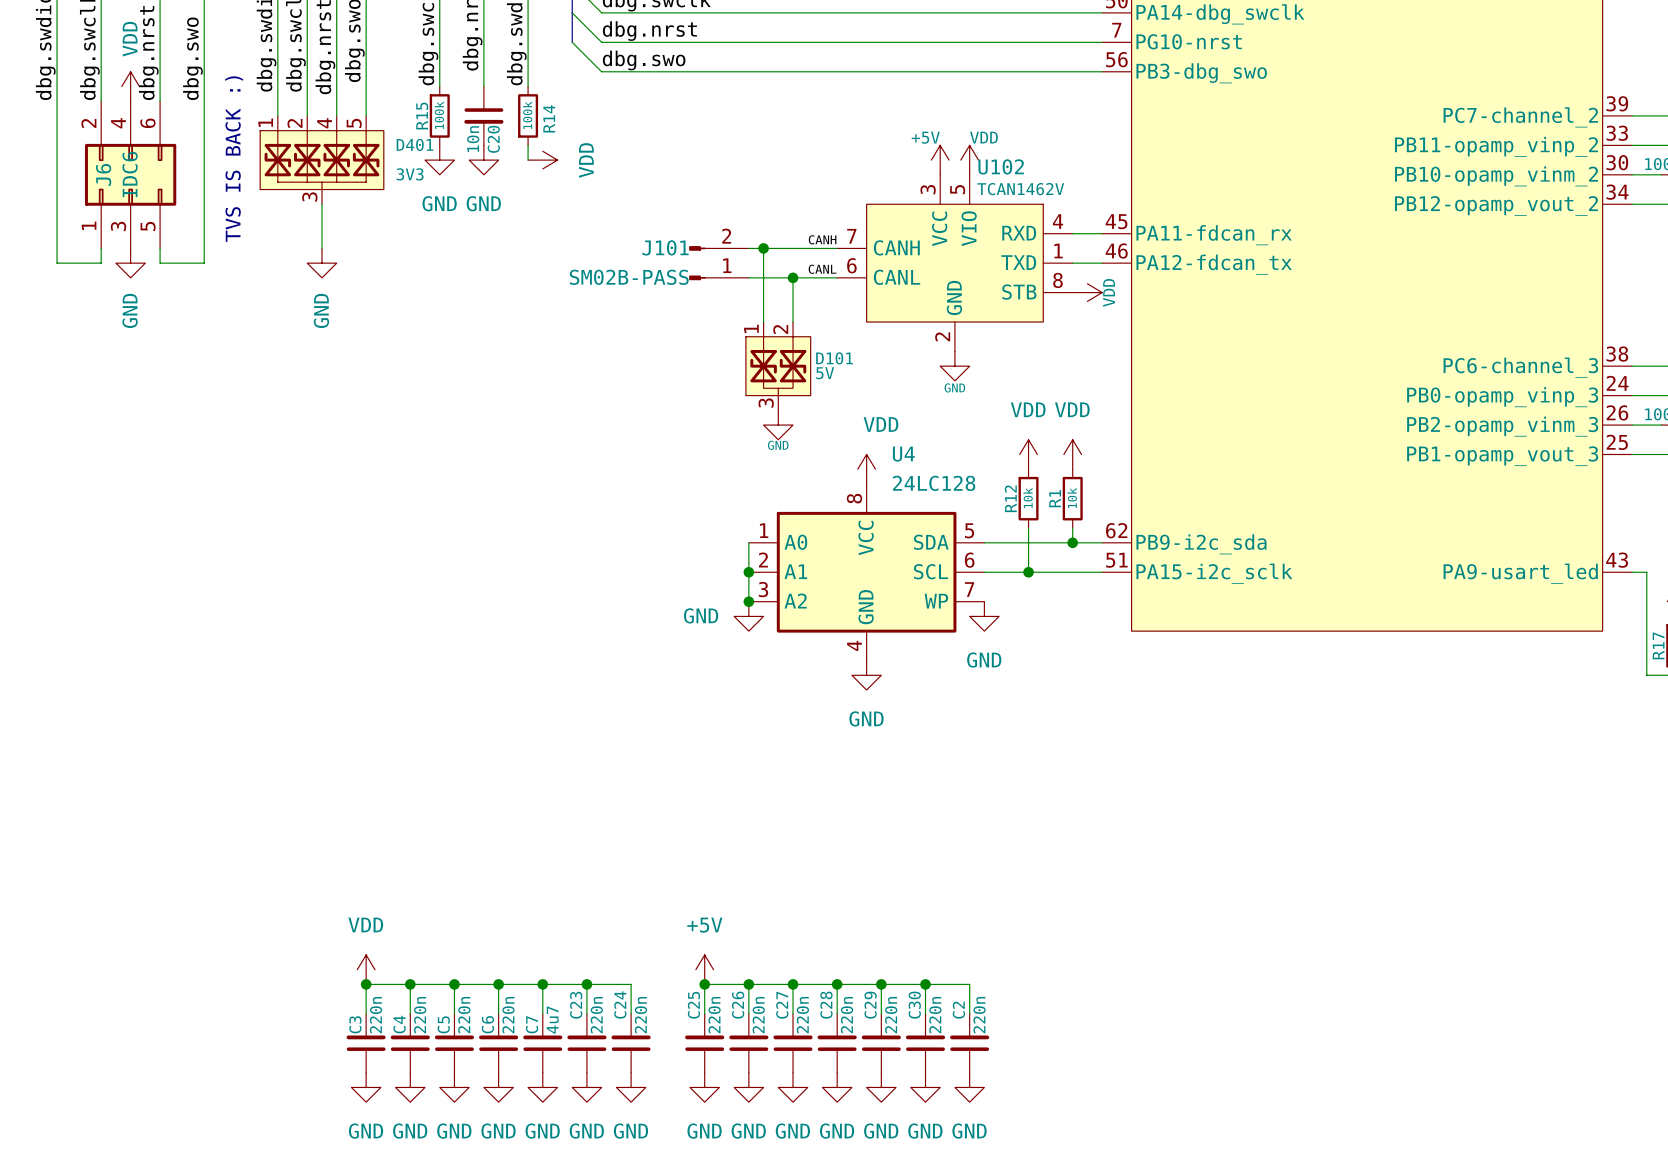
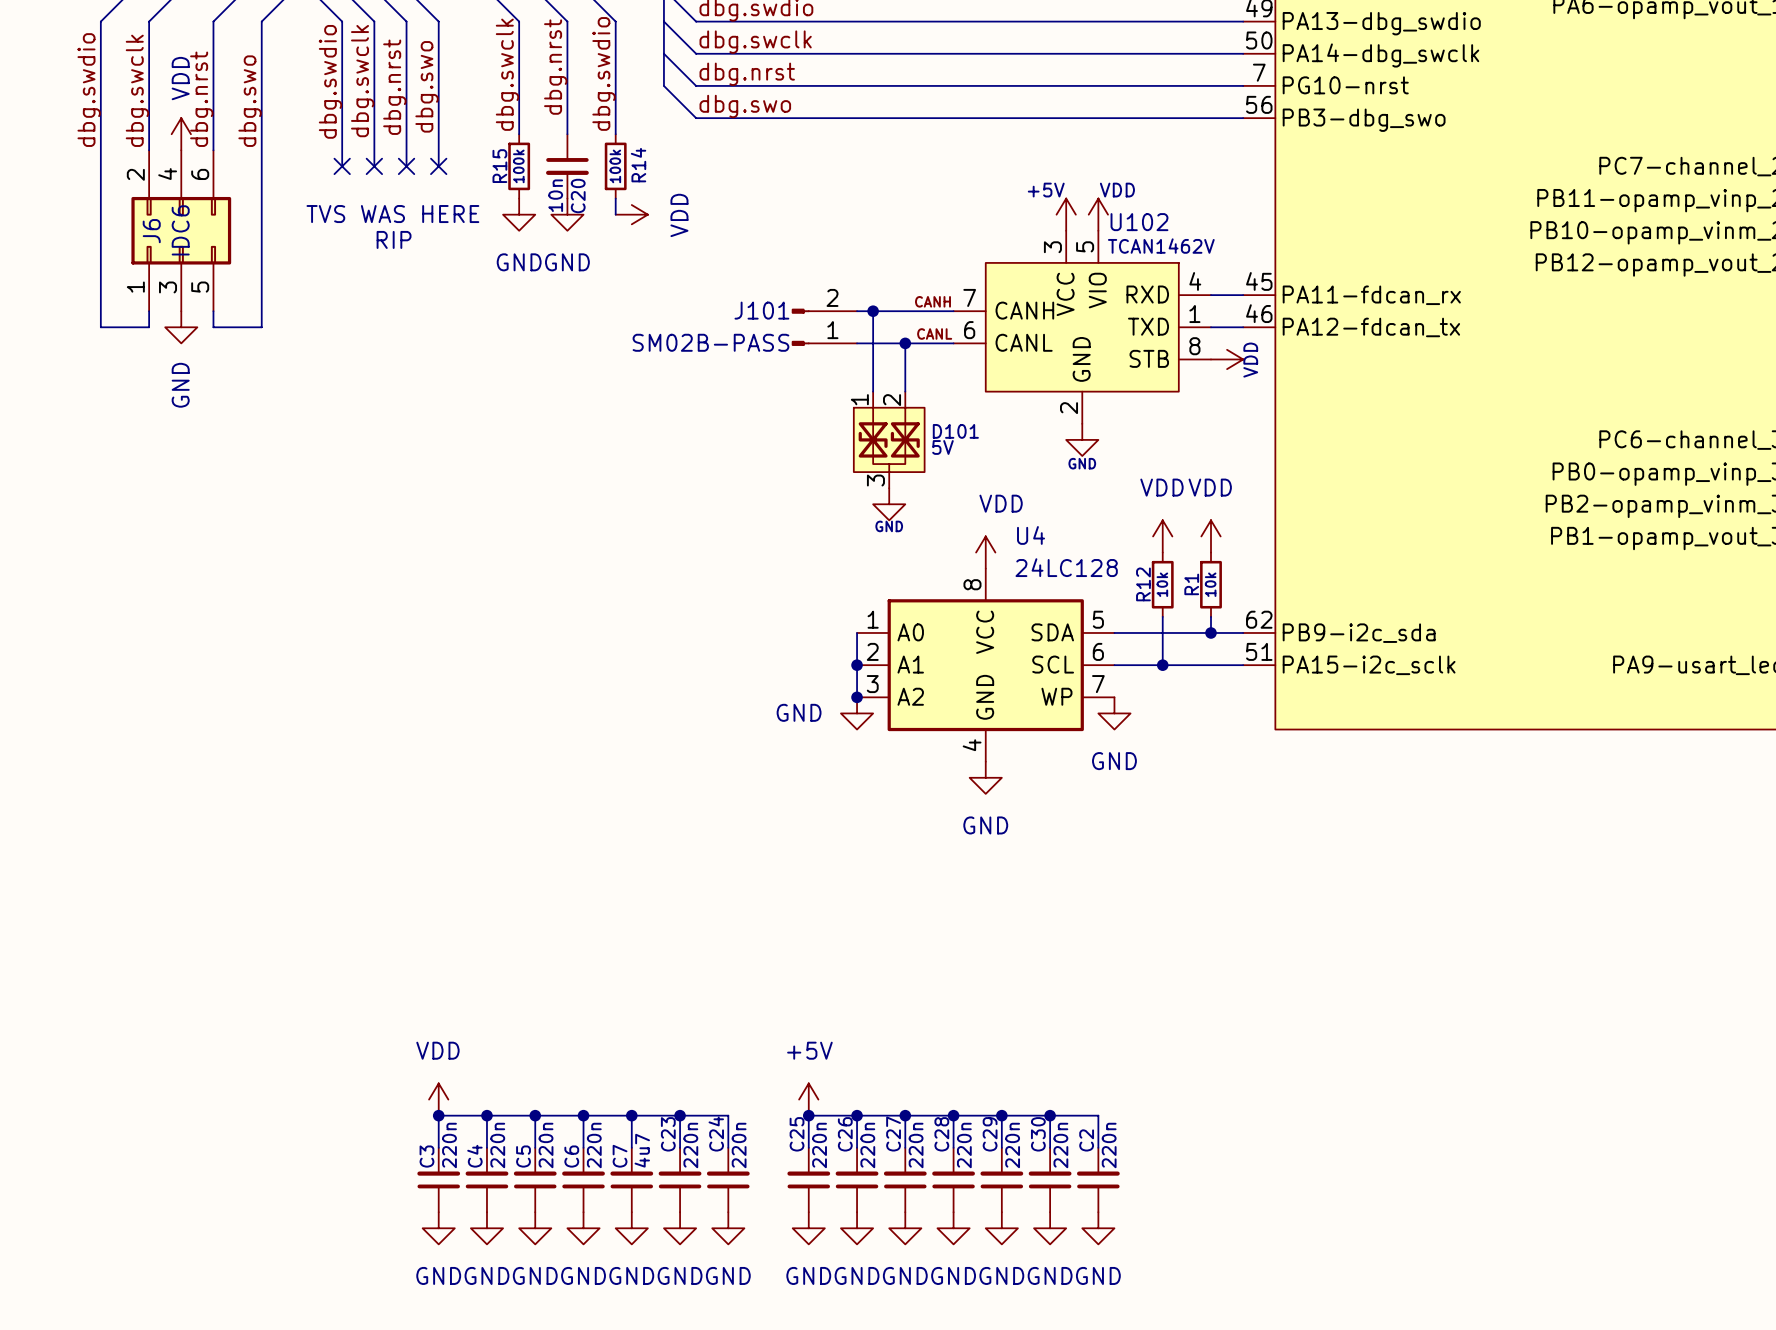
no-connect mark: none -> (342, 166)
no-connect mark: none -> (374, 166)
no-connect mark: none -> (406, 166)
no-connect mark: none -> (438, 166)
text: TVS IS BACK :) (234, 159) -> none
text: none -> TVS WAS HERE (392, 214)
D401: 3V3 (321, 160) -> none
text: none -> RIP (394, 239)
wire: (321, 204) (321, 248) -> none
power symbol: GND (321, 263) -> none

